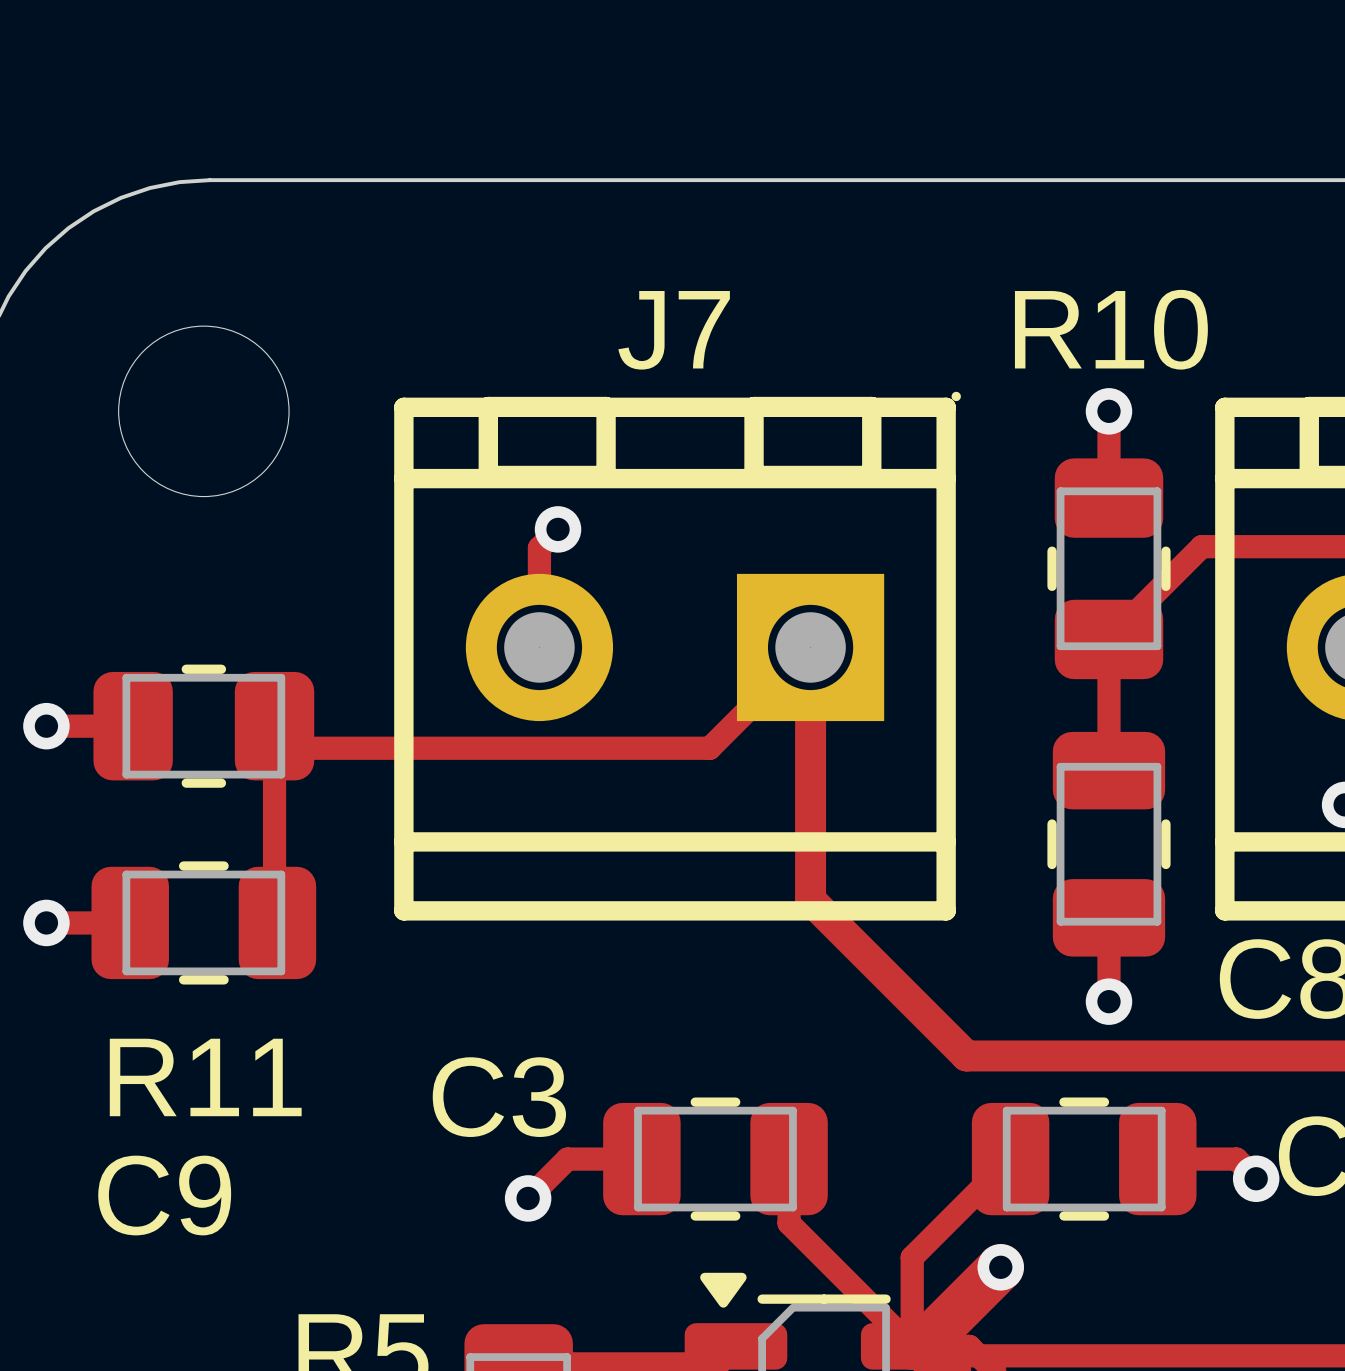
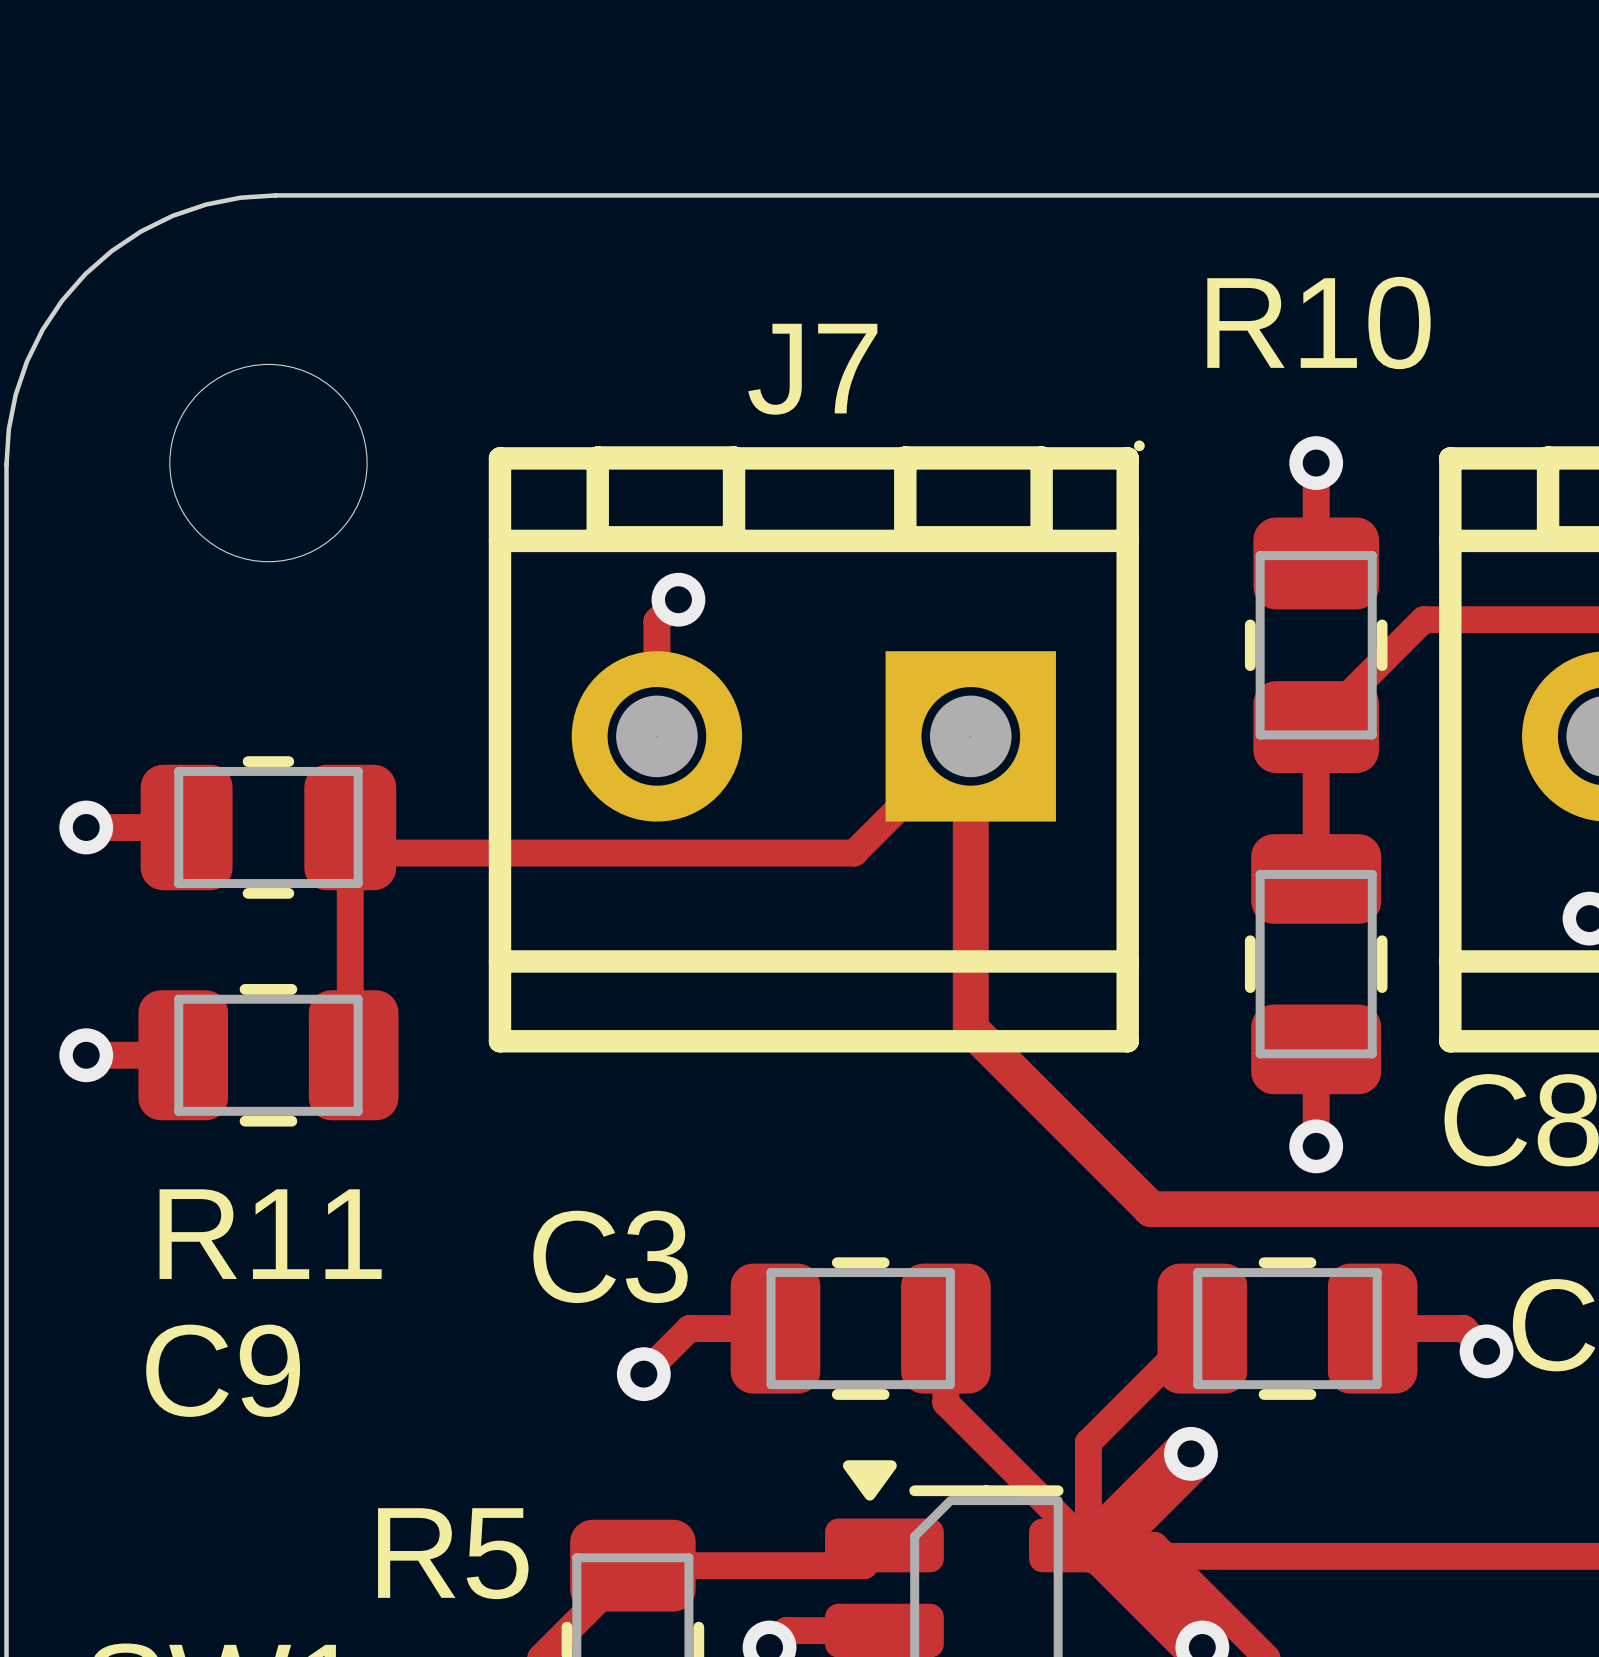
R10 name position: R10 (1111, 329) -> R10 (1319, 323)

